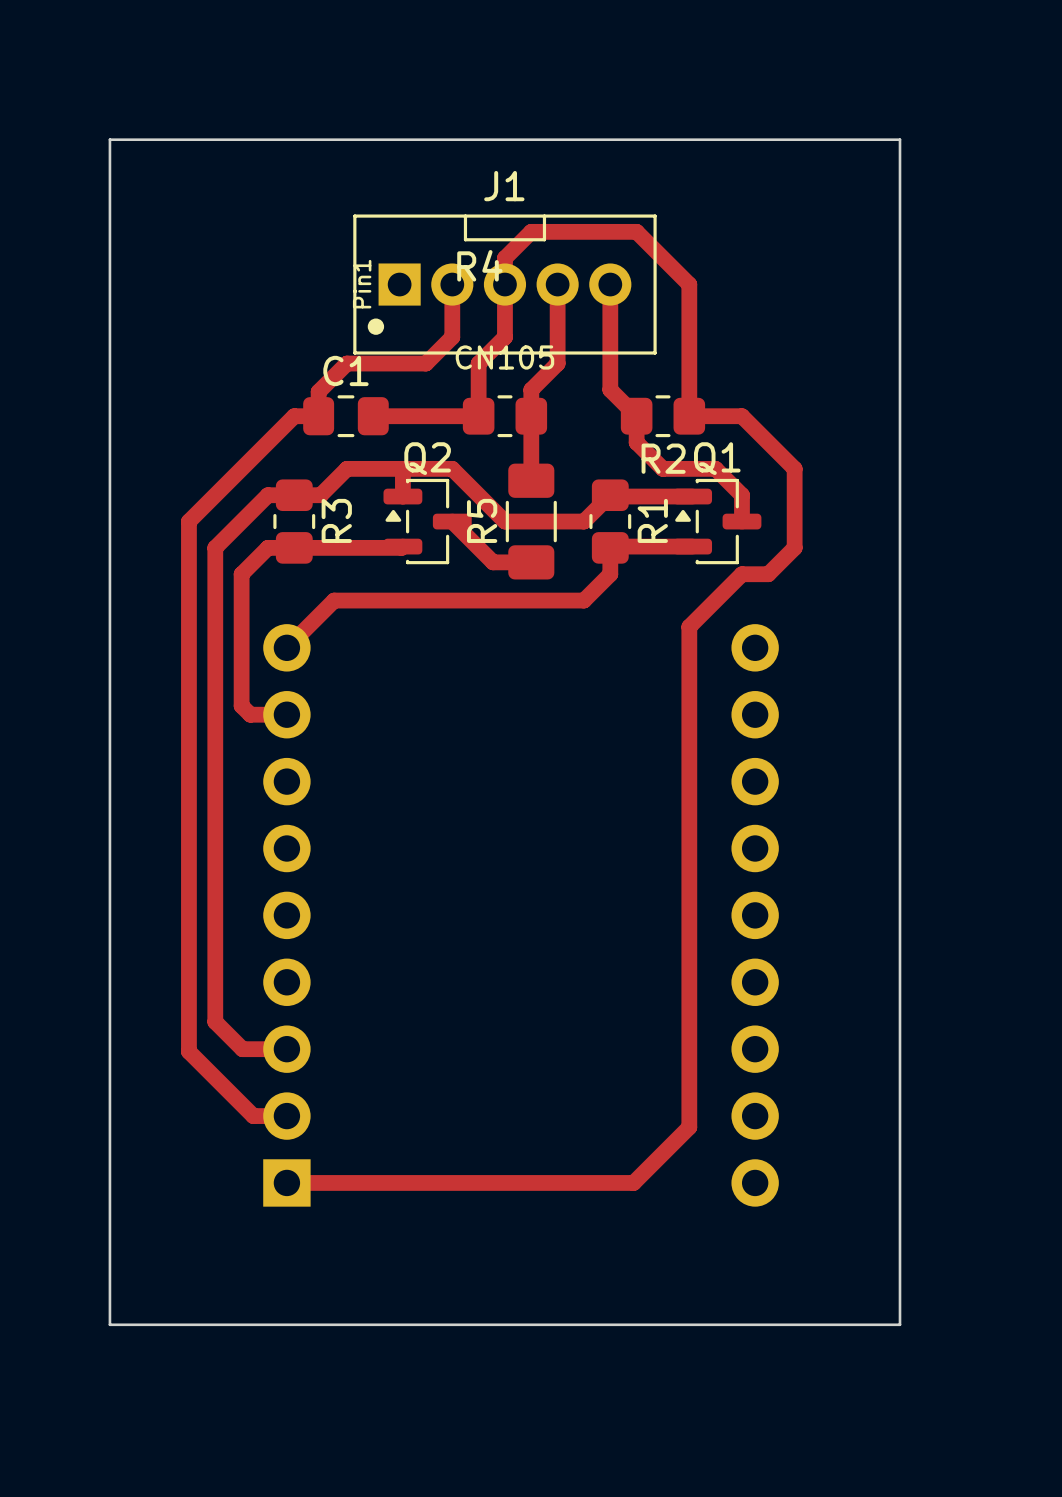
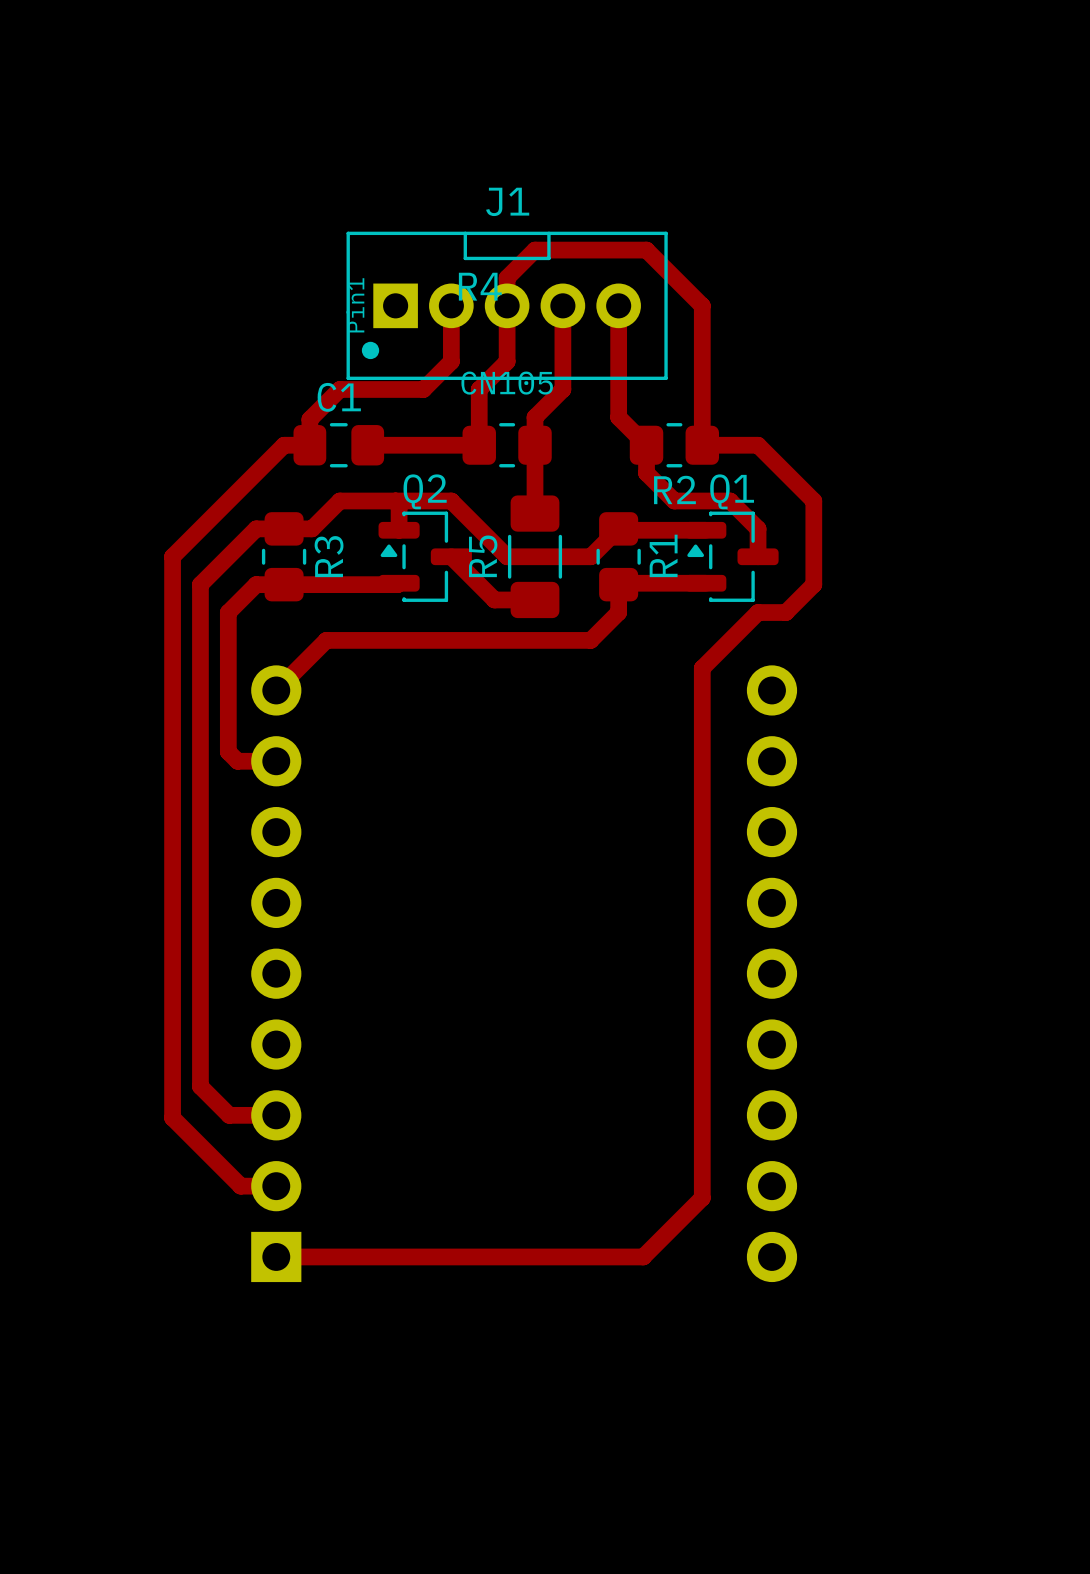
board edge: (109, 139) (900, 139) (900, 1324) (109, 1324) (109, 139) -> none

